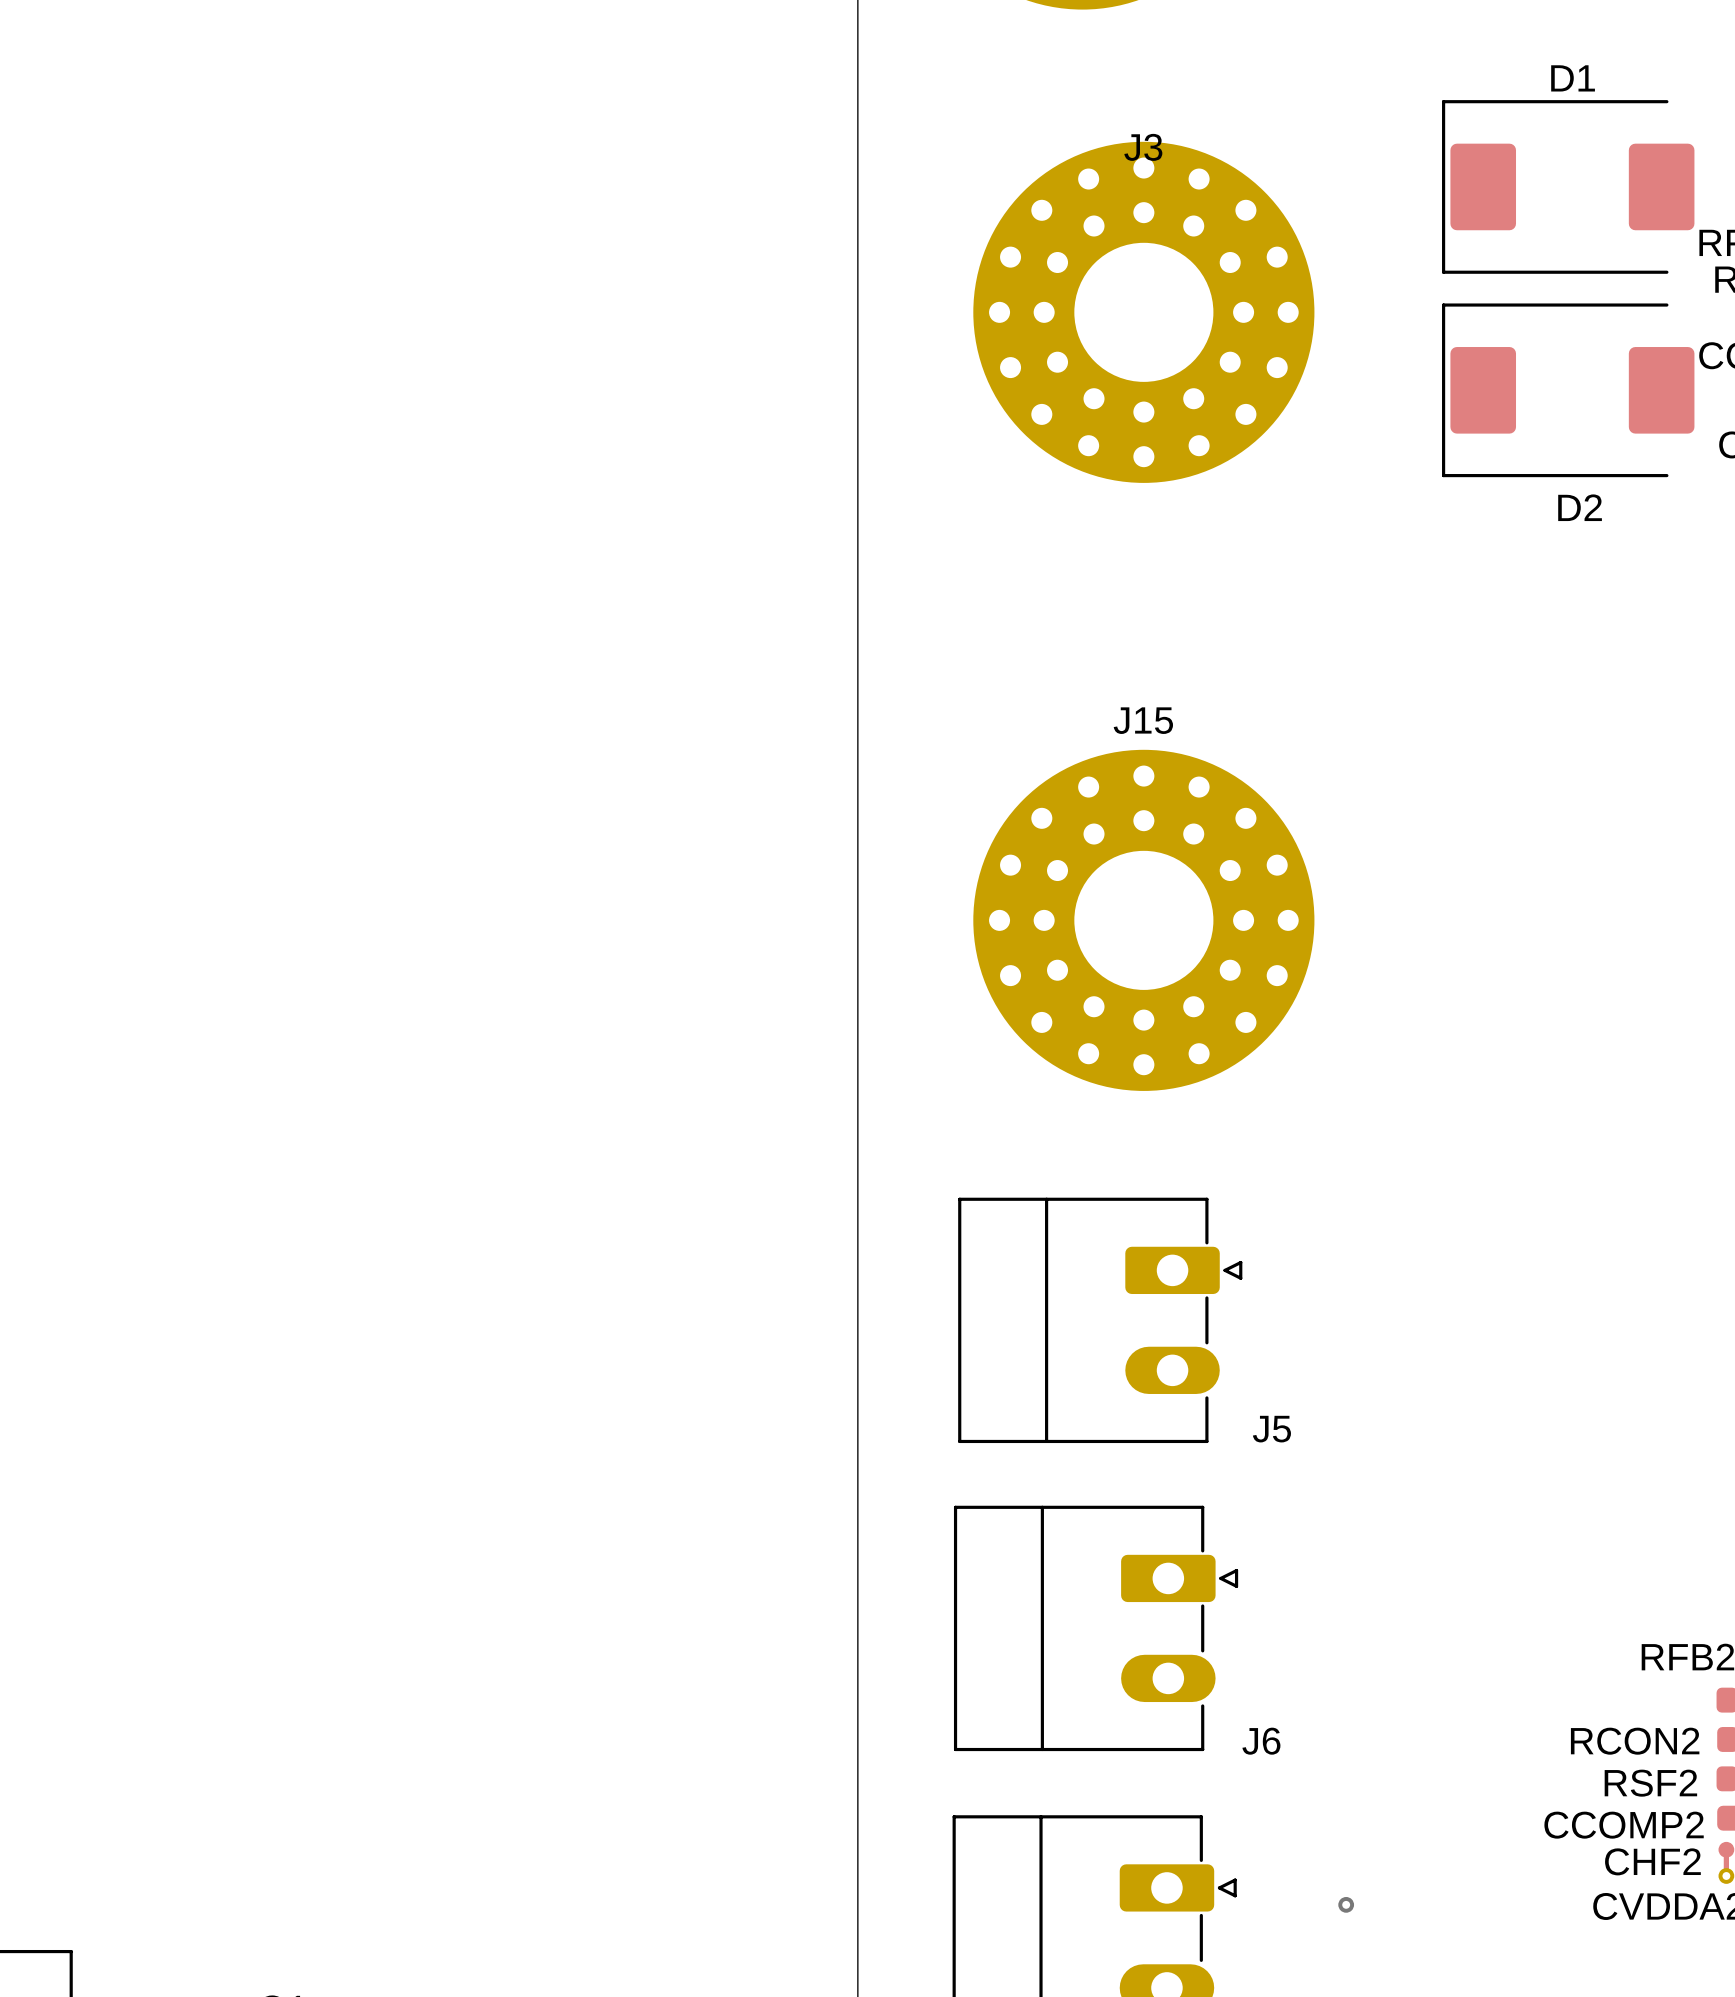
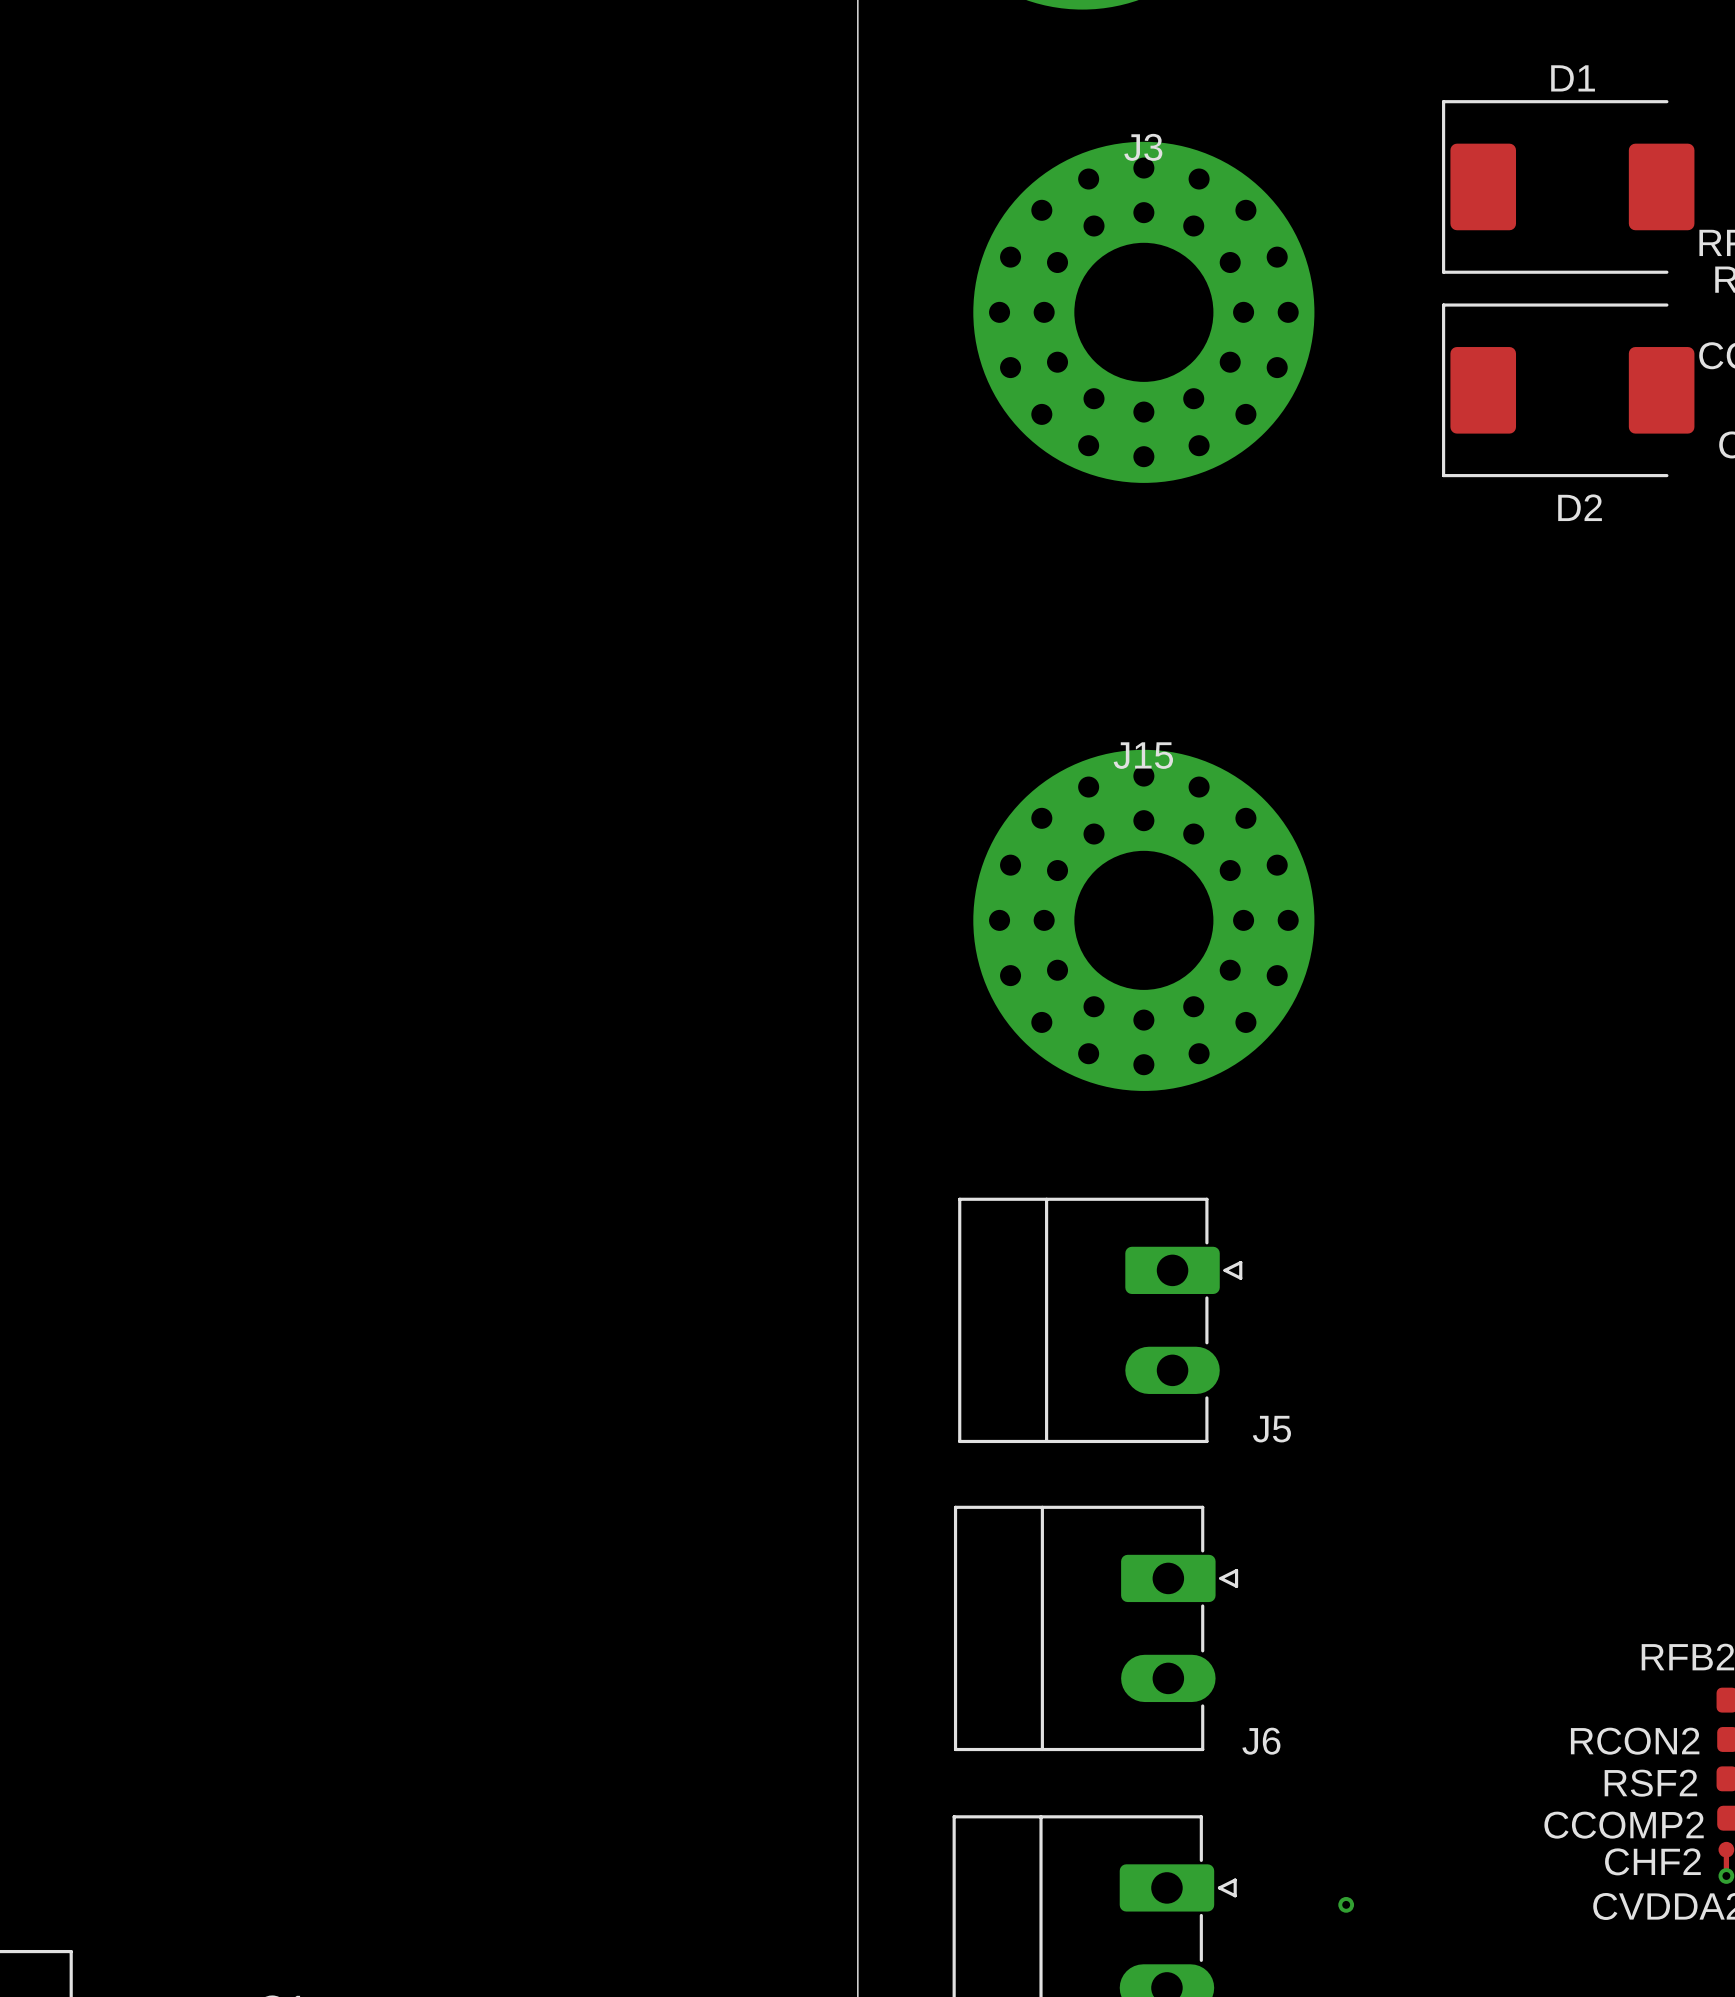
J15 name position: J15 (1143, 720) -> J15 (1143, 755)

